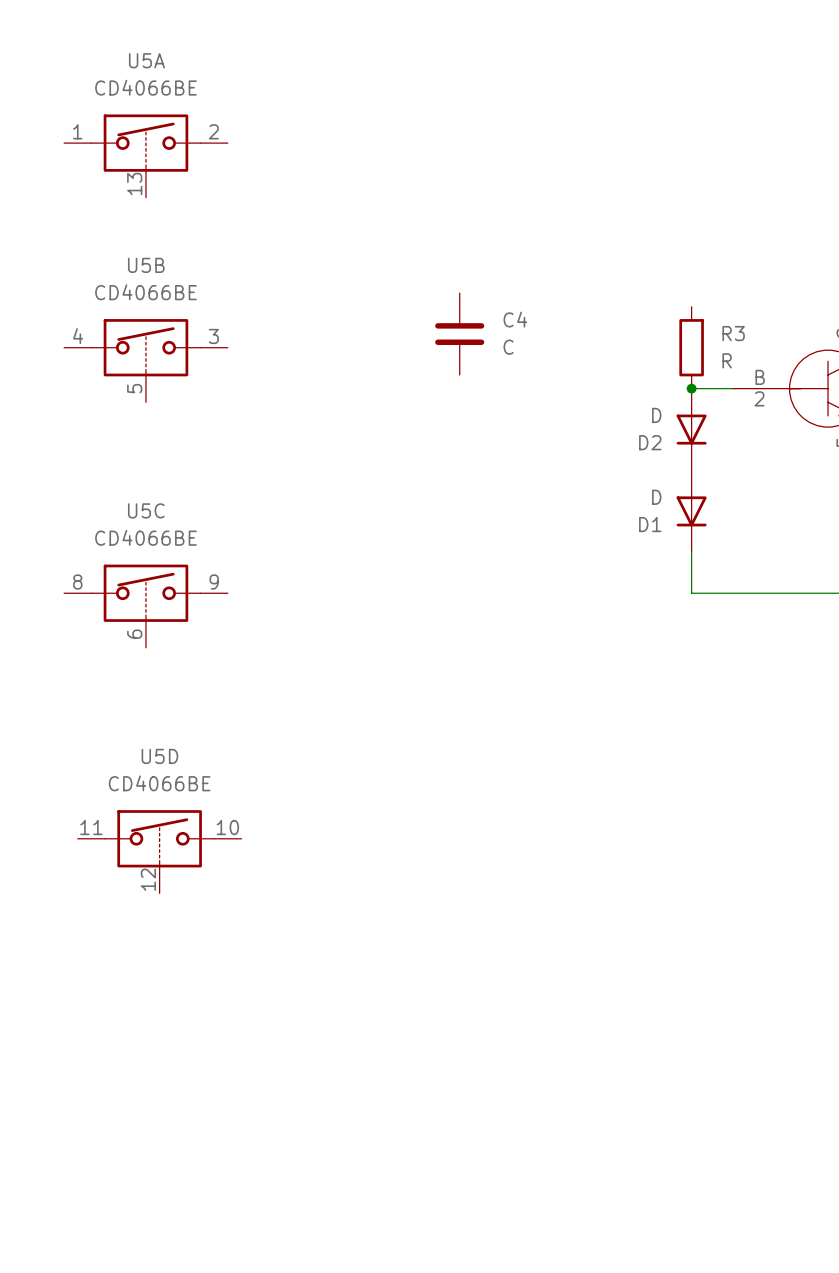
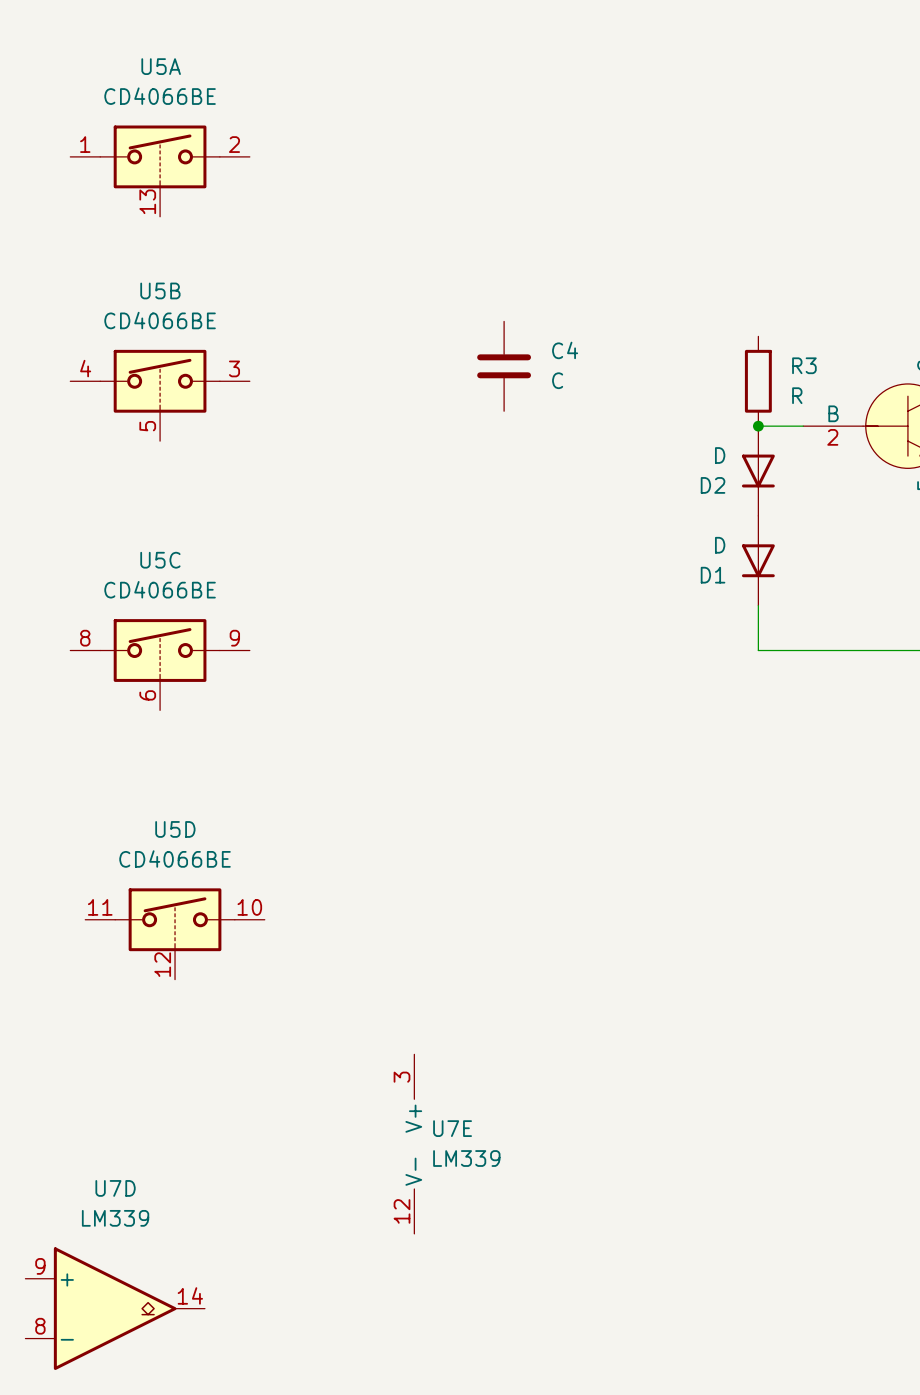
U7E: none -> LM339 (414, 1144)
U7D: none -> LM339 (115, 1308)

